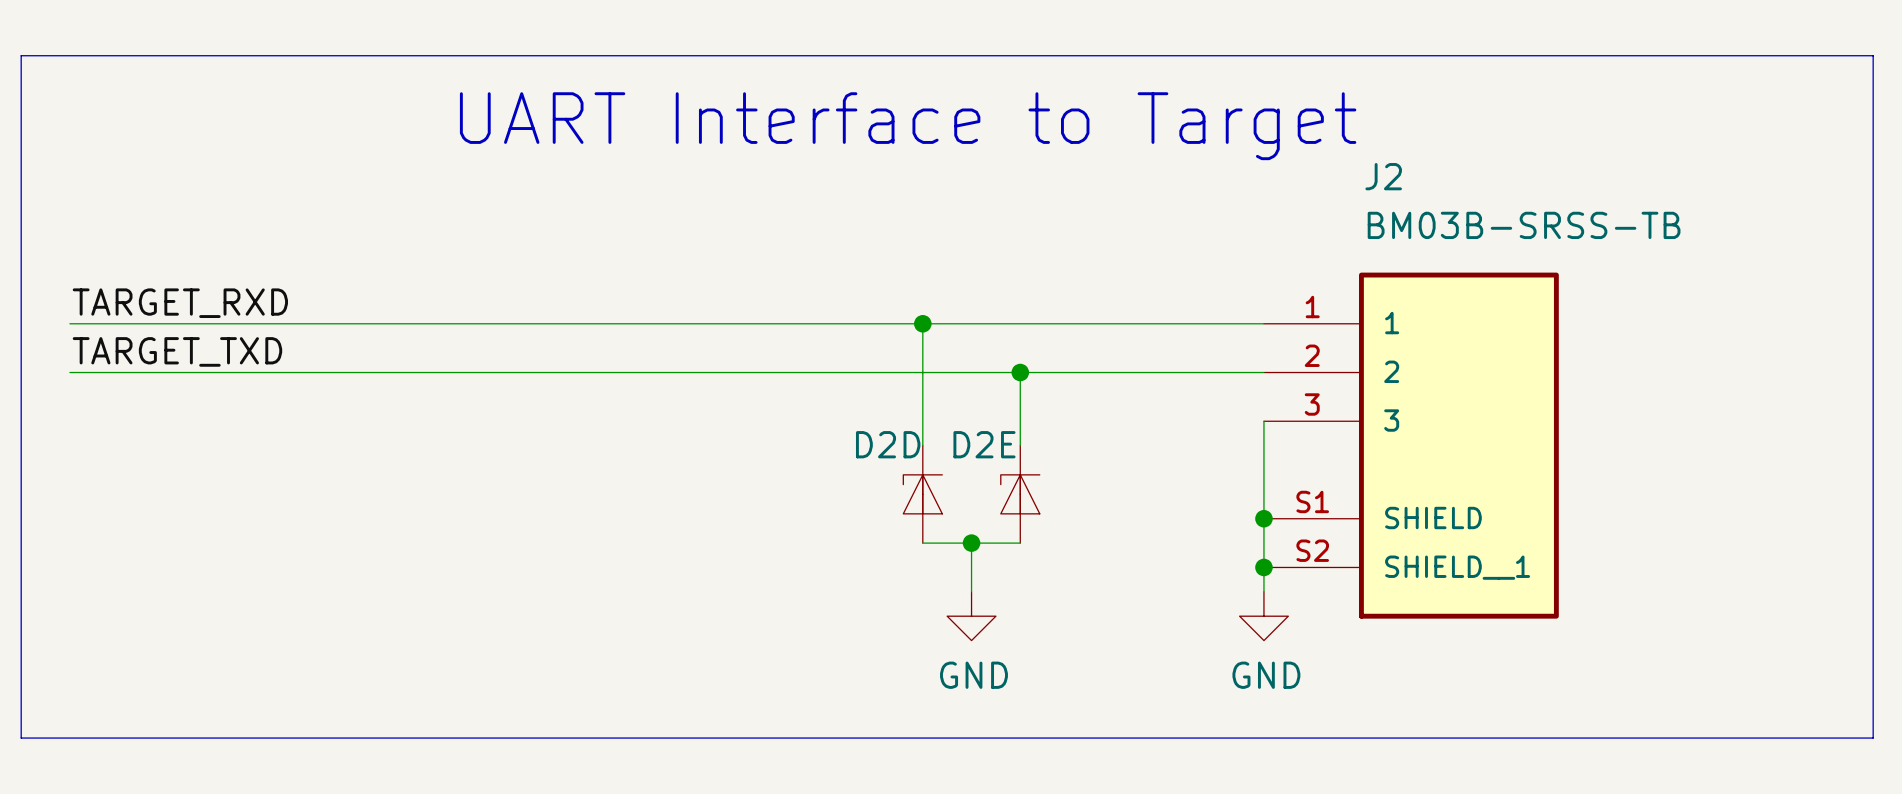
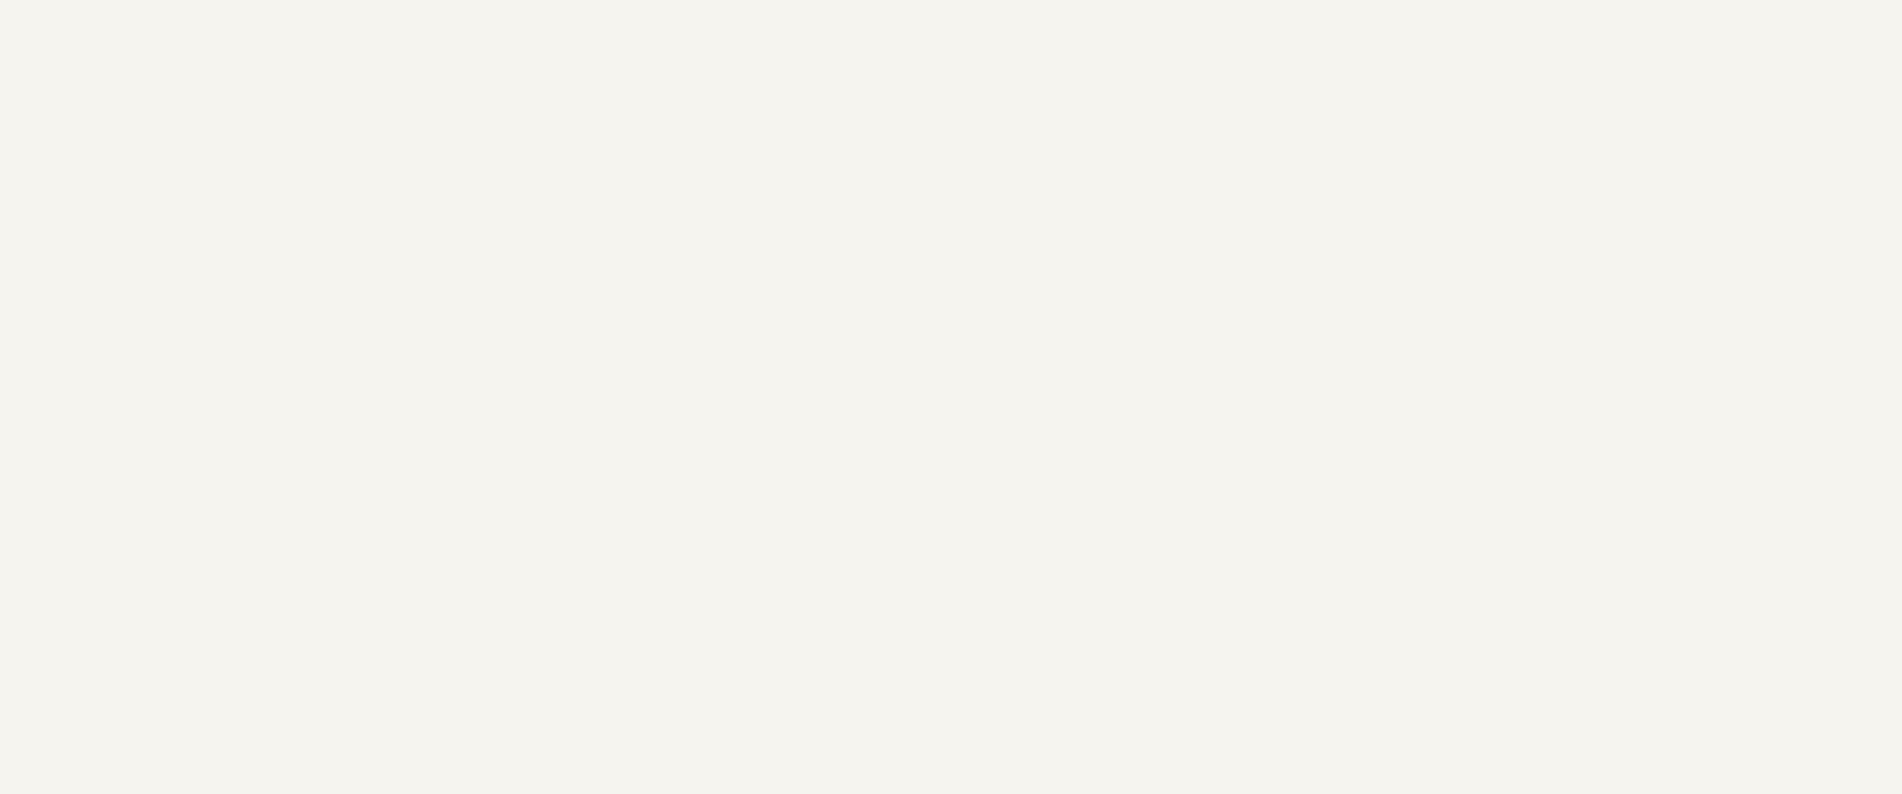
line: (21, 55) (1873, 55) (1873, 738) (21, 738) (21, 55) -> none
text: UART Interface to Target (908, 126) -> none
label: TARGET_RXD (180, 303) -> none
wire: (69, 323) (1263, 323) -> none
wire: (922, 323) (922, 445) -> none
junction: (922, 323) -> none
label: TARGET_TXD (177, 351) -> none
wire: (69, 372) (1263, 372) -> none
wire: (1020, 372) (1020, 445) -> none
junction: (1020, 372) -> none
wire: (1263, 421) (1263, 591) -> none
J2: BM03B-SRSS-TB (1411, 445) -> none
D2D: (922, 494) -> none
D2E: (1020, 494) -> none
junction: (1263, 518) -> none
wire: (922, 543) (1020, 543) -> none
wire: (971, 543) (971, 591) -> none
junction: (971, 543) -> none
junction: (1263, 567) -> none
power symbol: GND (971, 616) -> none
power symbol: GND (1263, 616) -> none

